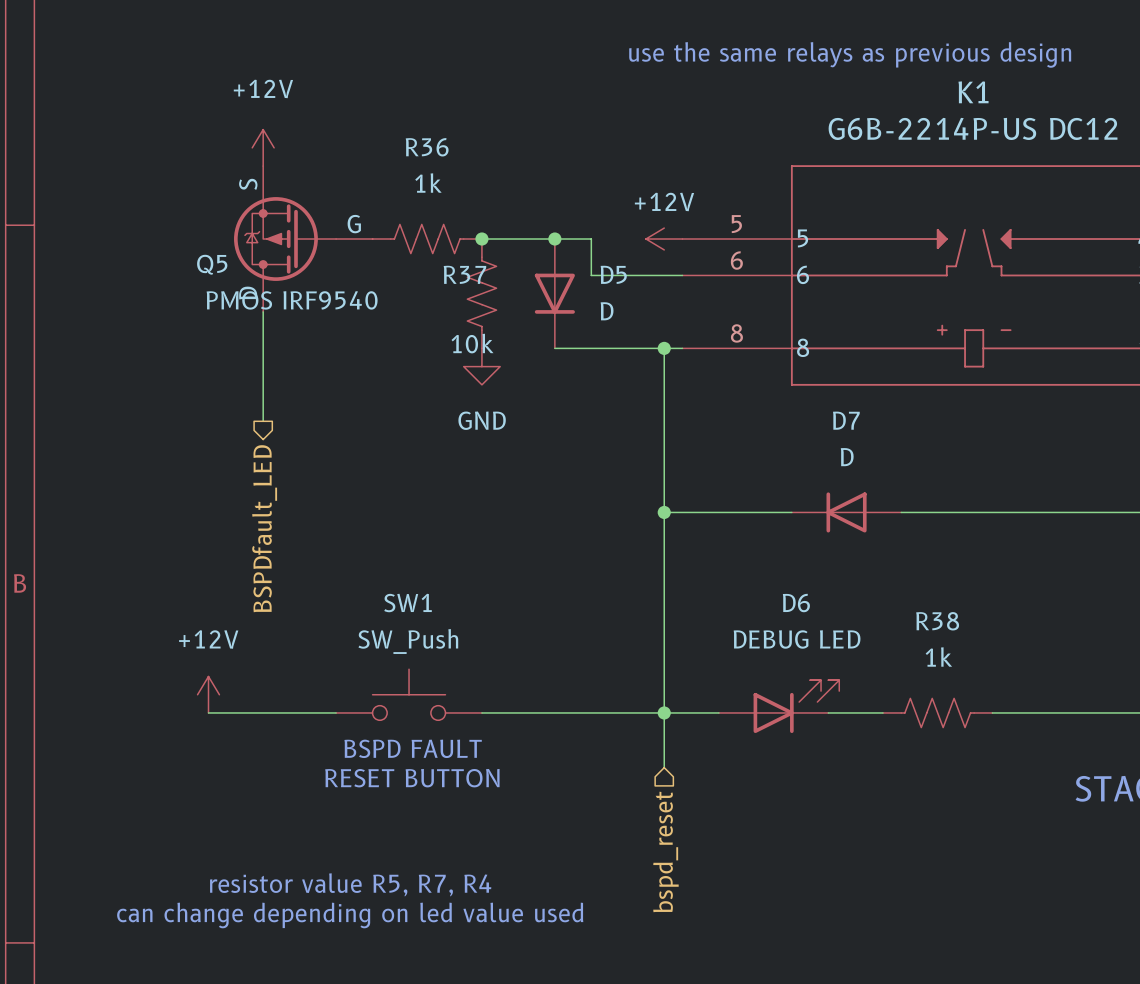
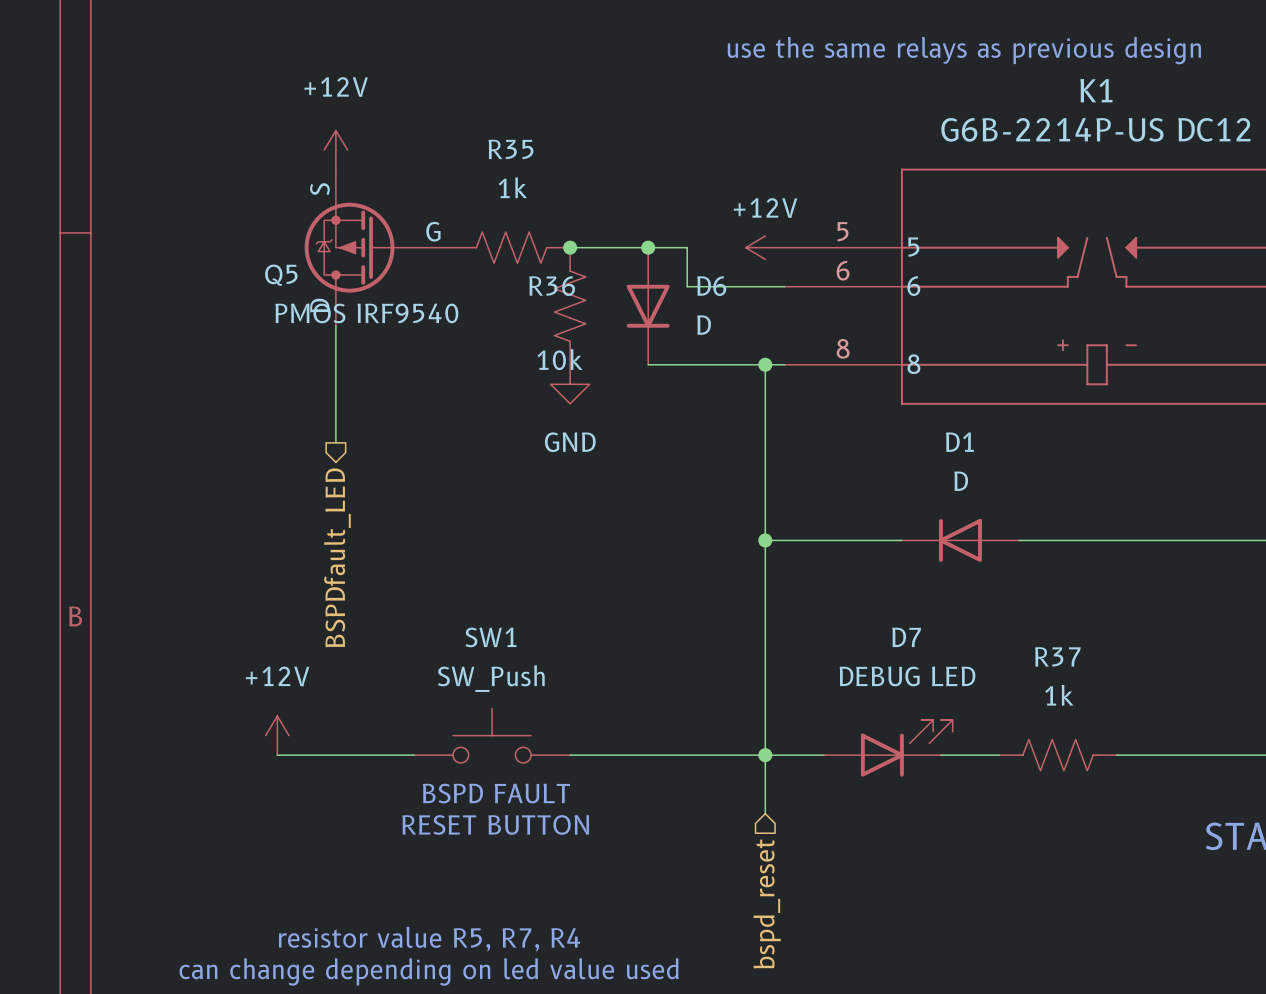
R36 name: R36 (427, 147) -> R35 (510, 149)
R37 name: R37 (464, 274) -> R36 (552, 286)
D5 name: D5 (613, 274) -> D6 (711, 286)
D7 name: D7 (846, 420) -> D1 (959, 442)
D6 name: D6 (796, 603) -> D7 (906, 637)
R38 name: R38 (937, 621) -> R37 (1057, 656)

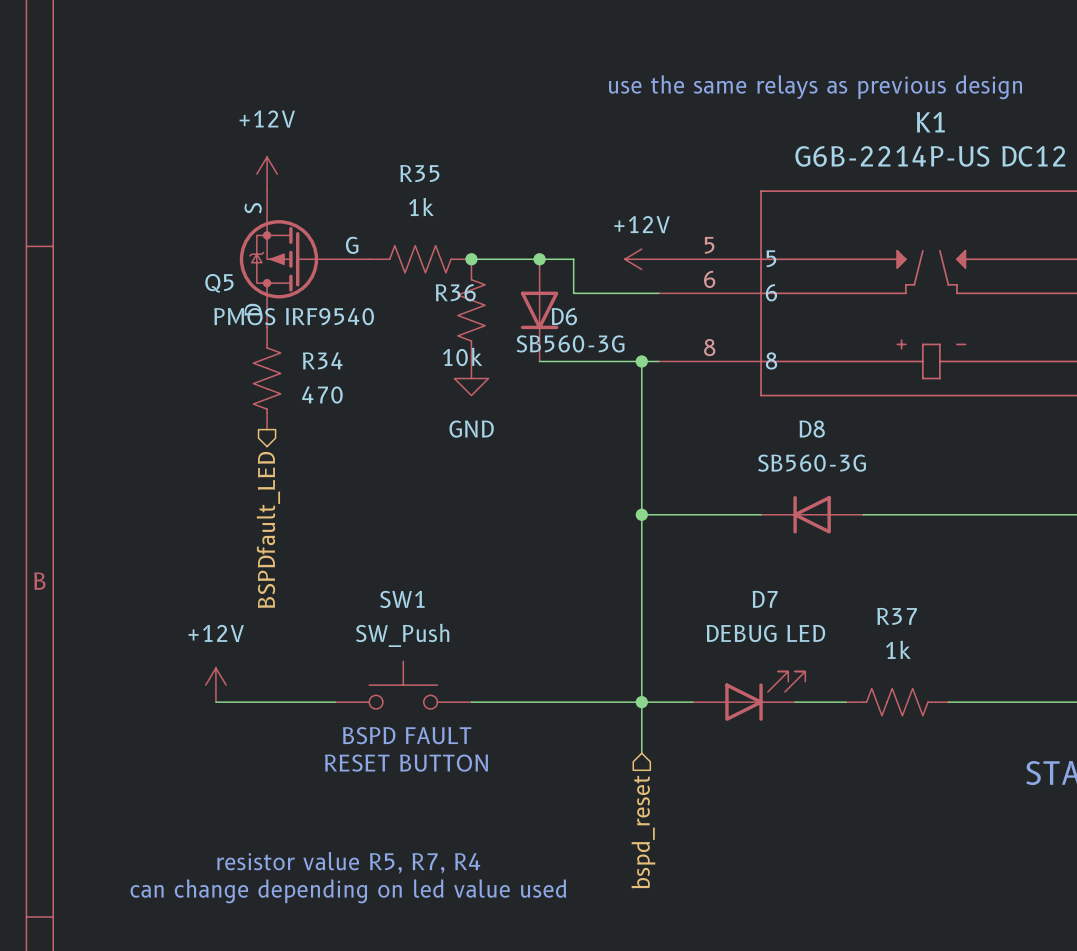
D6 name position: D6 (711, 286) -> D6 (564, 316)
wire: (335, 325) (335, 442) -> none
D6 value: D (704, 325) -> SB560-3G (570, 343)
R34: none -> 470 (267, 378)
D1 name: D1 (959, 442) -> D8 (812, 429)
D1 value: D (961, 481) -> SB560-3G (812, 463)

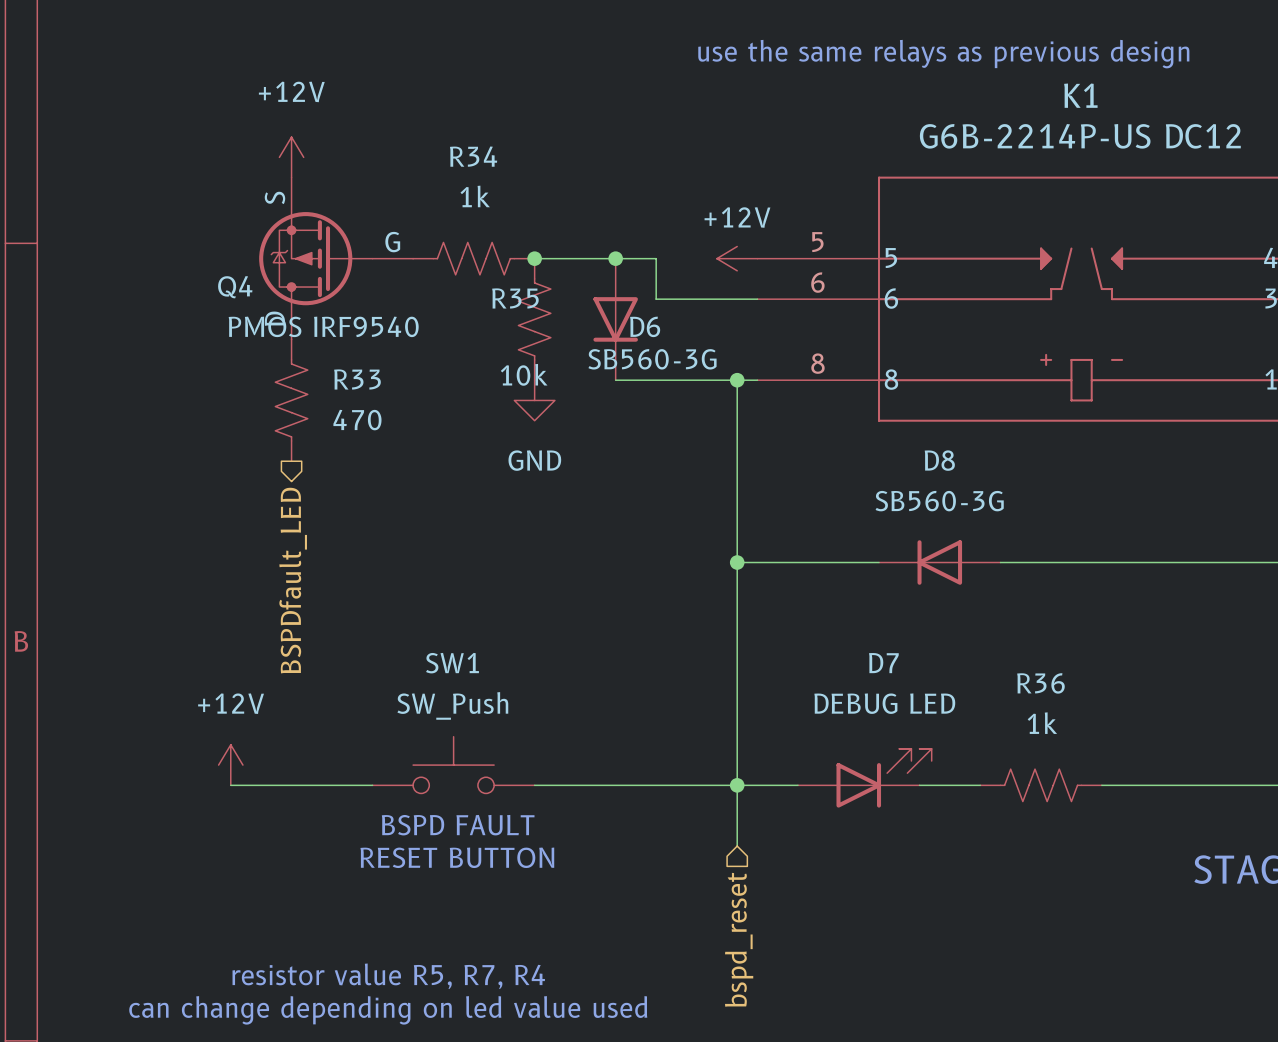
R35 name: R35 (419, 173) -> R34 (473, 156)
Q5 name: Q5 (219, 283) -> Q4 (235, 287)
R36 name: R36 (455, 292) -> R35 (515, 298)
R34 name: R34 (322, 360) -> R33 (357, 379)
R37 name: R37 (897, 616) -> R36 (1040, 683)

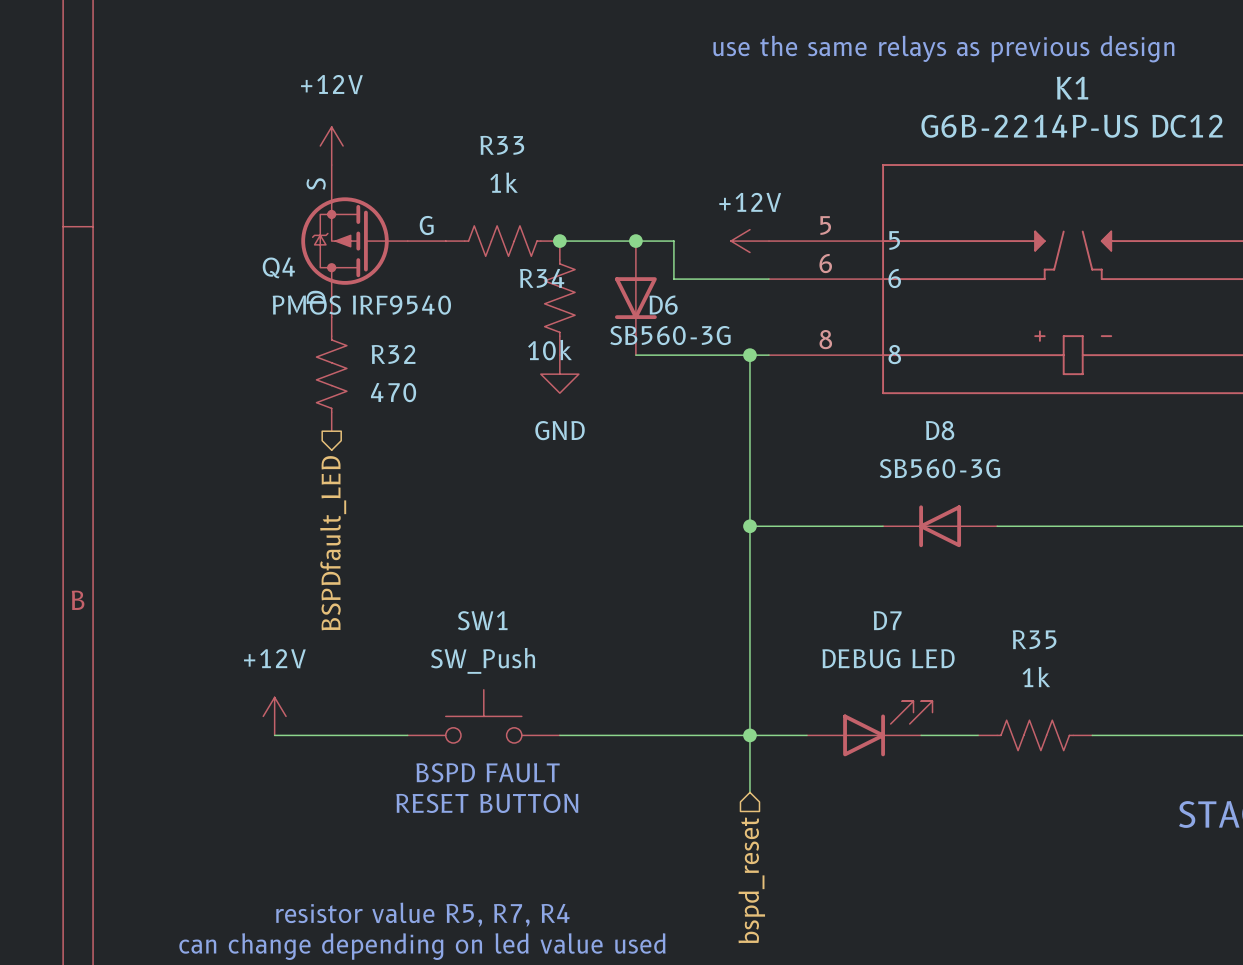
R34 name: R34 (473, 156) -> R33 (502, 145)
R35 name: R35 (515, 298) -> R34 (542, 278)
R33 name: R33 (357, 379) -> R32 (393, 354)
R36 name: R36 (1040, 683) -> R35 (1034, 639)

